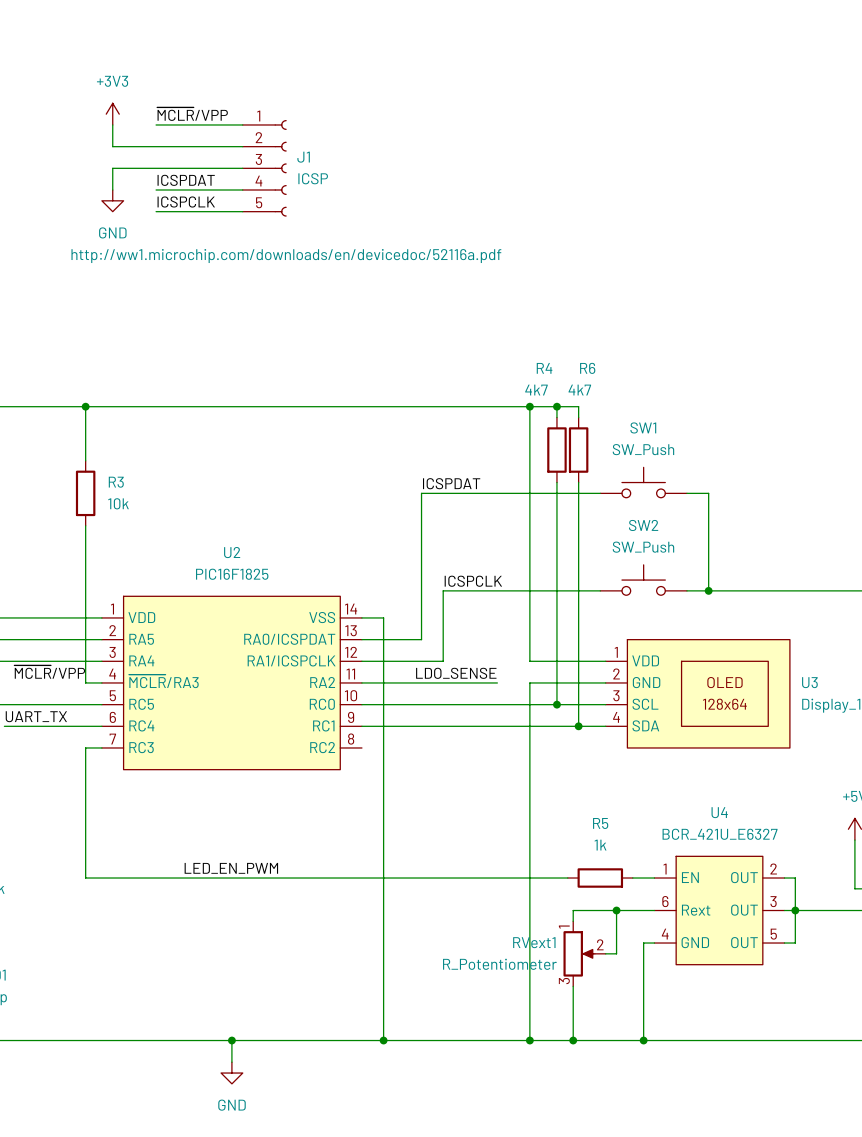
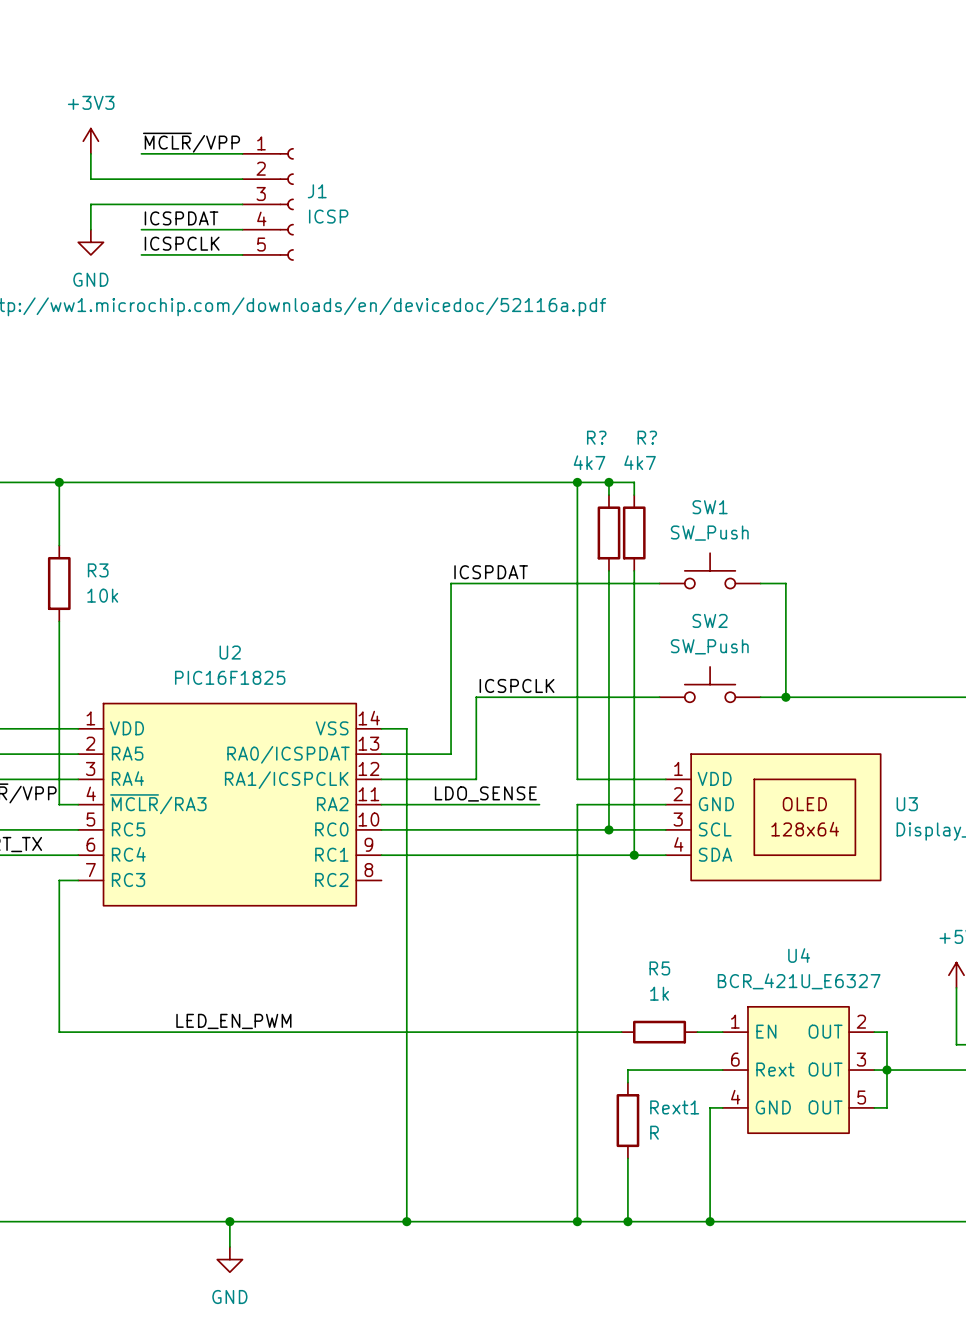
R4 name: R4 (544, 368) -> R? (596, 437)
R6 name: R6 (587, 368) -> R? (647, 437)
wire: (616, 910) (616, 953) (605, 953) -> none
junction: (616, 910) -> none
Rext1: none -> R (627, 1120)
RVext1: R_Potentiometer (584, 953) -> none

